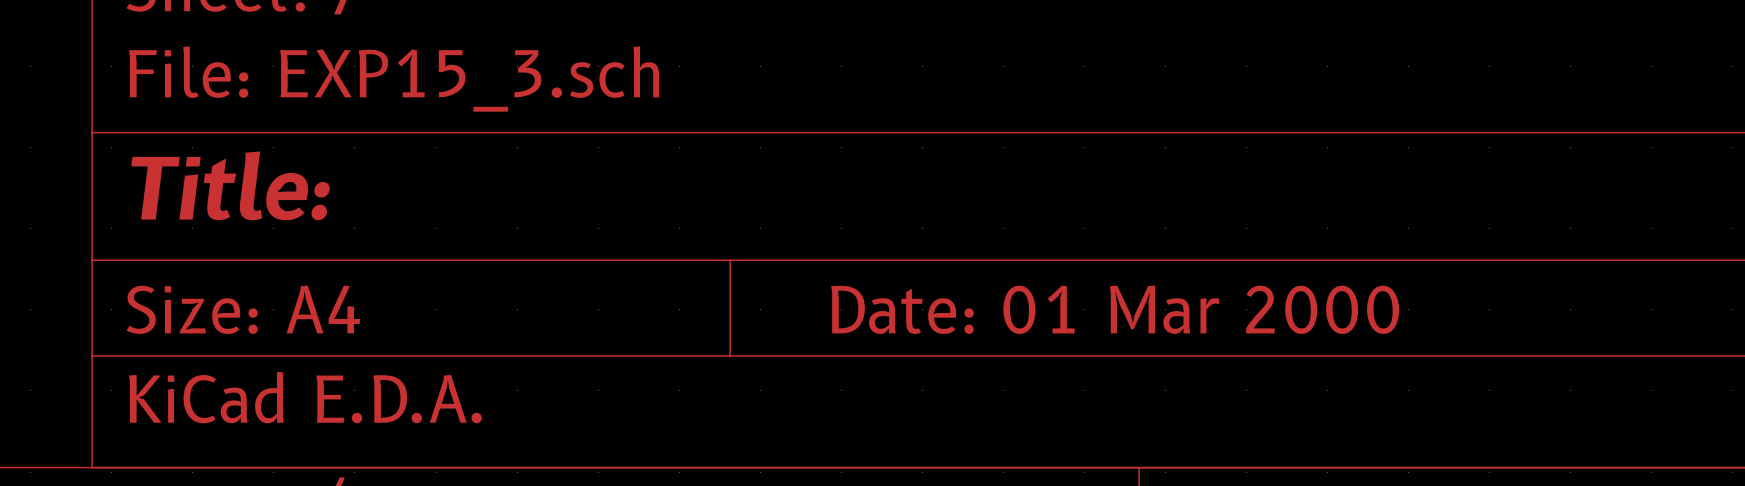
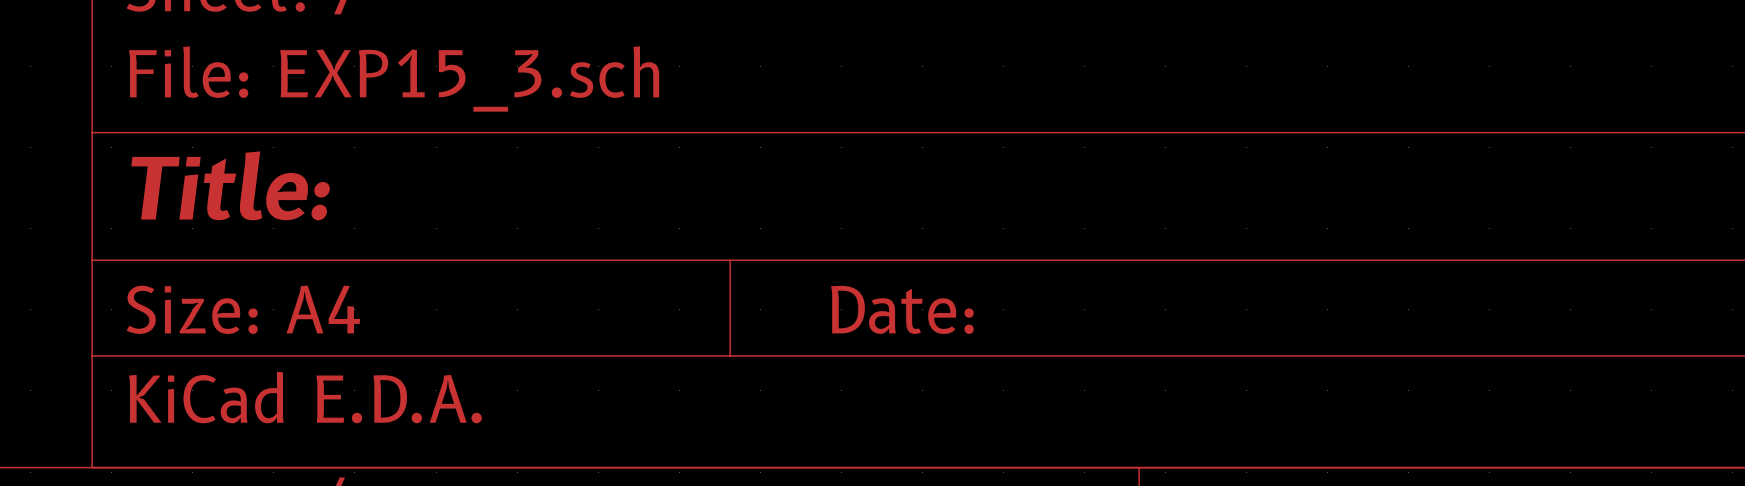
title block: Date: 01 Mar 2000 (1115, 309) -> Date: (902, 309)

